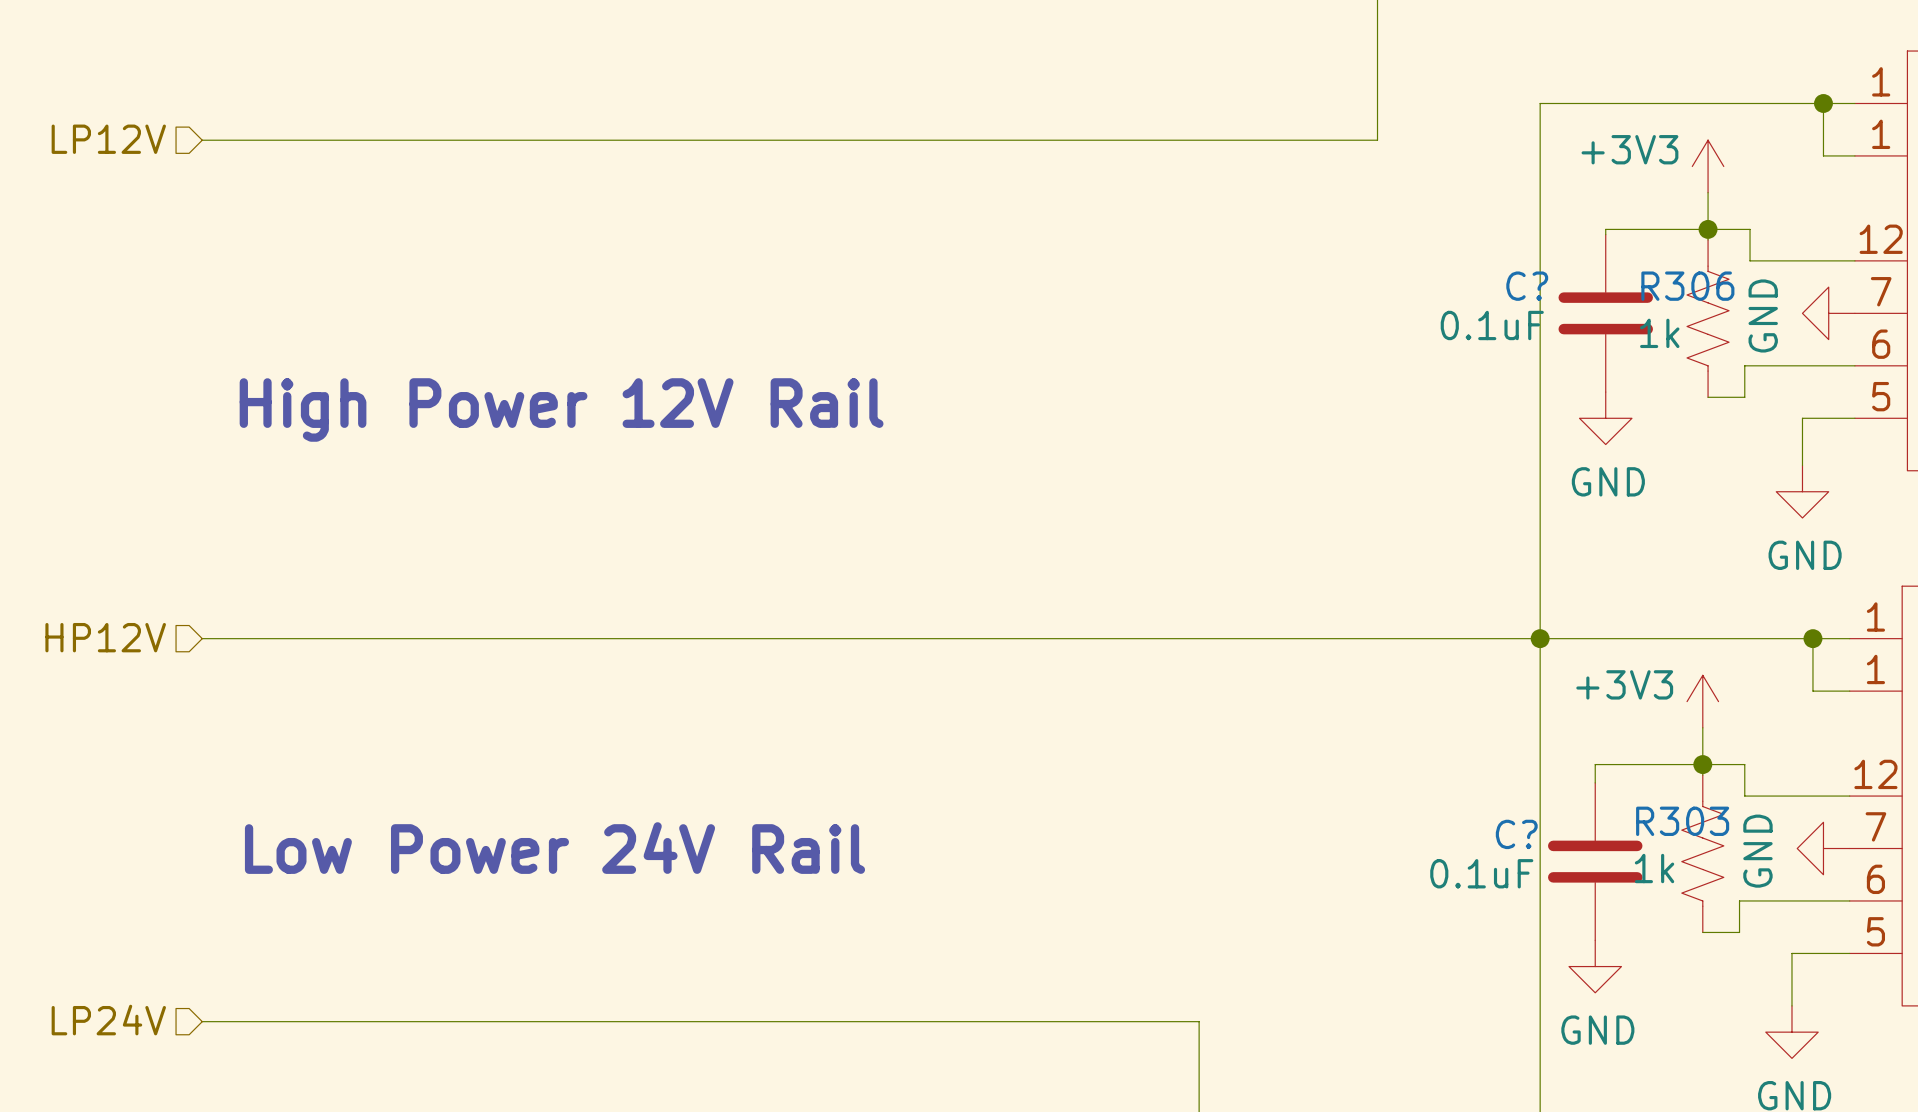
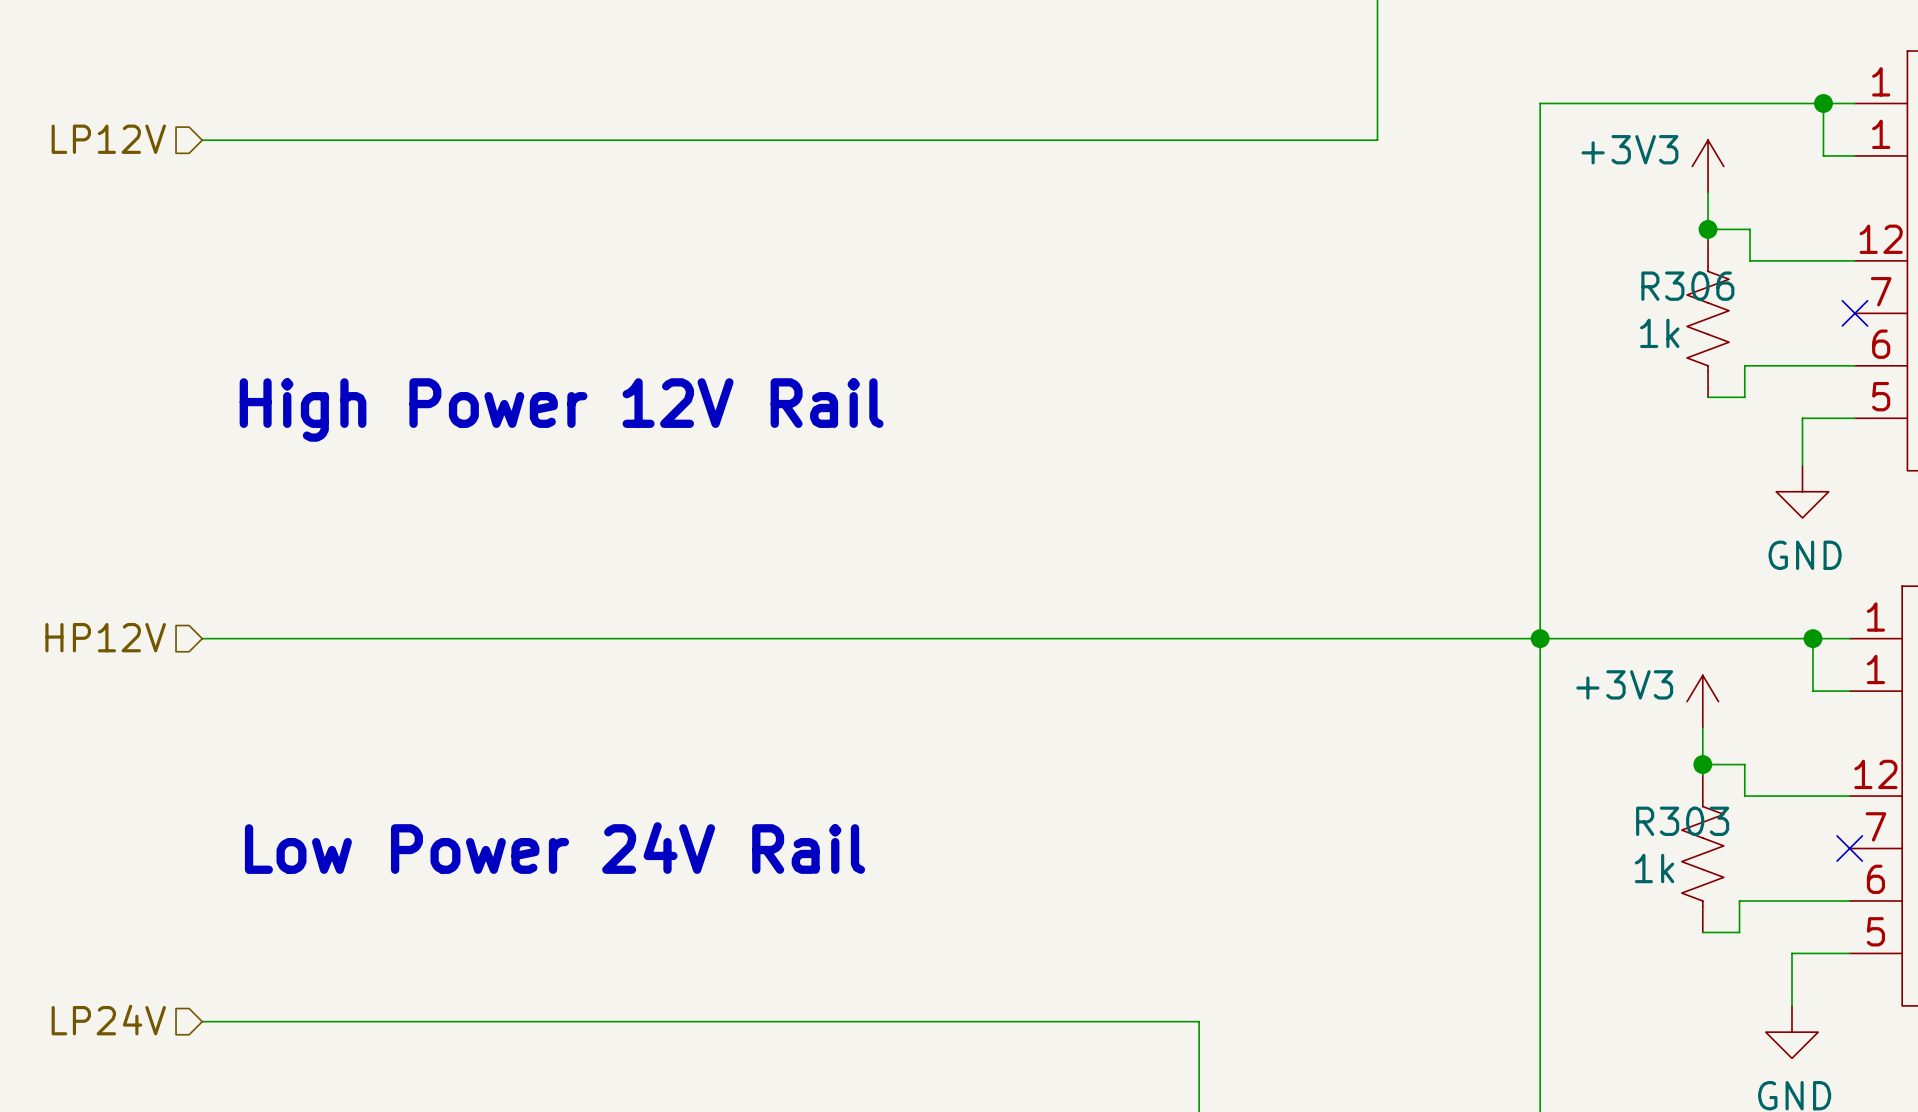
wire: (1708, 229) (1605, 229) (1605, 234) -> none
C?: 0.1uF (1605, 313) -> none
power symbol: GND (1828, 313) -> none
no-connect mark: none -> (1854, 313)
power symbol: GND (1605, 418) -> none
wire: (1702, 764) (1595, 764) (1595, 782) -> none
power symbol: GND (1823, 848) -> none
no-connect mark: none -> (1849, 848)
C?: 0.1uF (1595, 861) -> none
power symbol: GND (1595, 966) -> none

